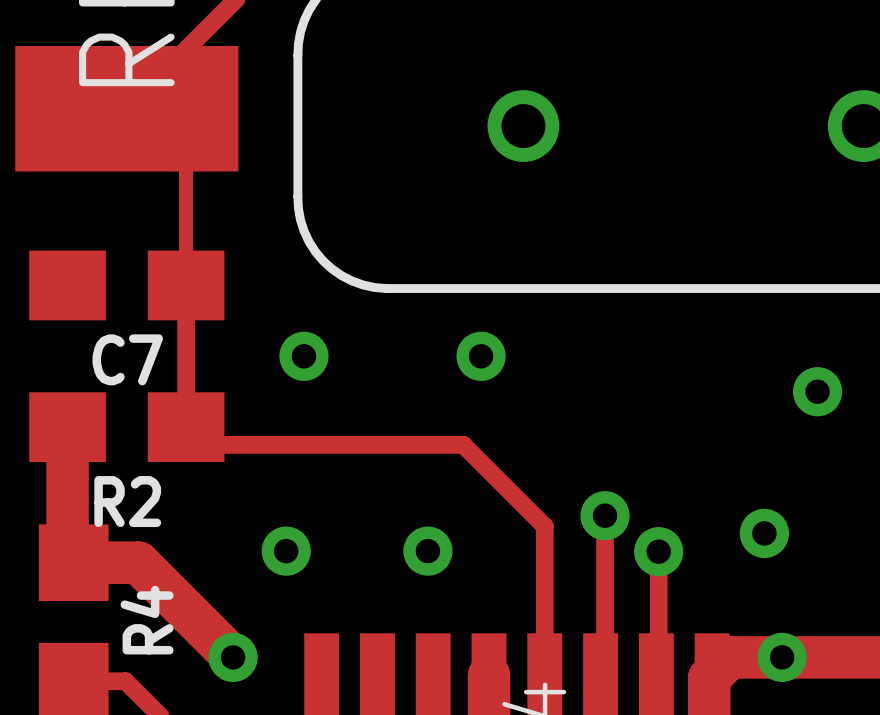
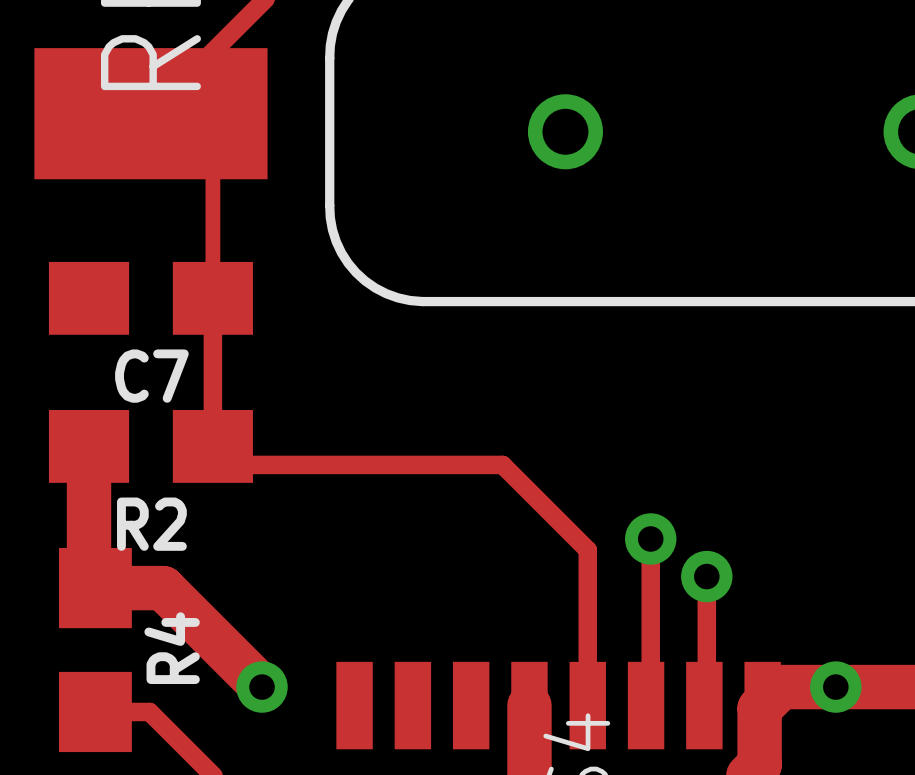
via: (303, 356) -> none
via: (481, 356) -> none
via: (817, 391) -> none
via: (764, 533) -> none
via: (286, 551) -> none
via: (427, 551) -> none

